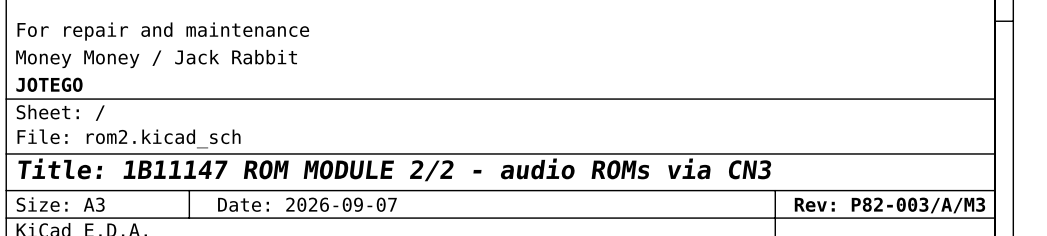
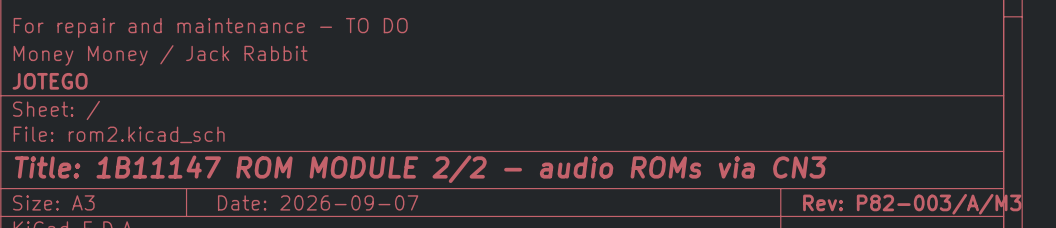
title block: For repair and maintenance (163, 31) -> For repair and maintenance - TO DO (210, 27)

